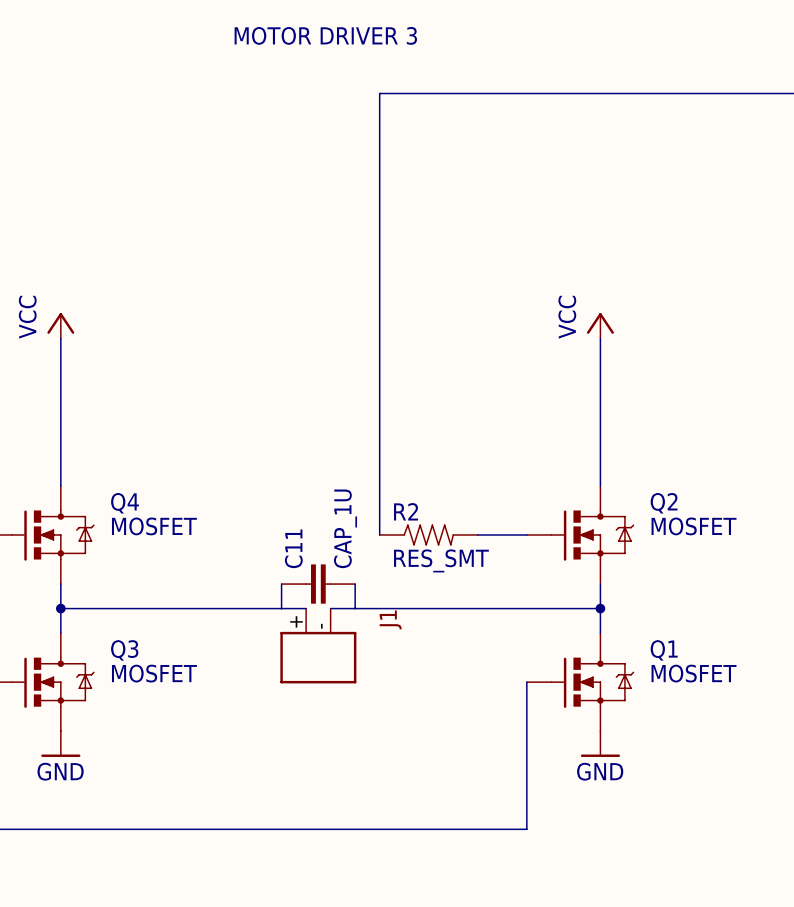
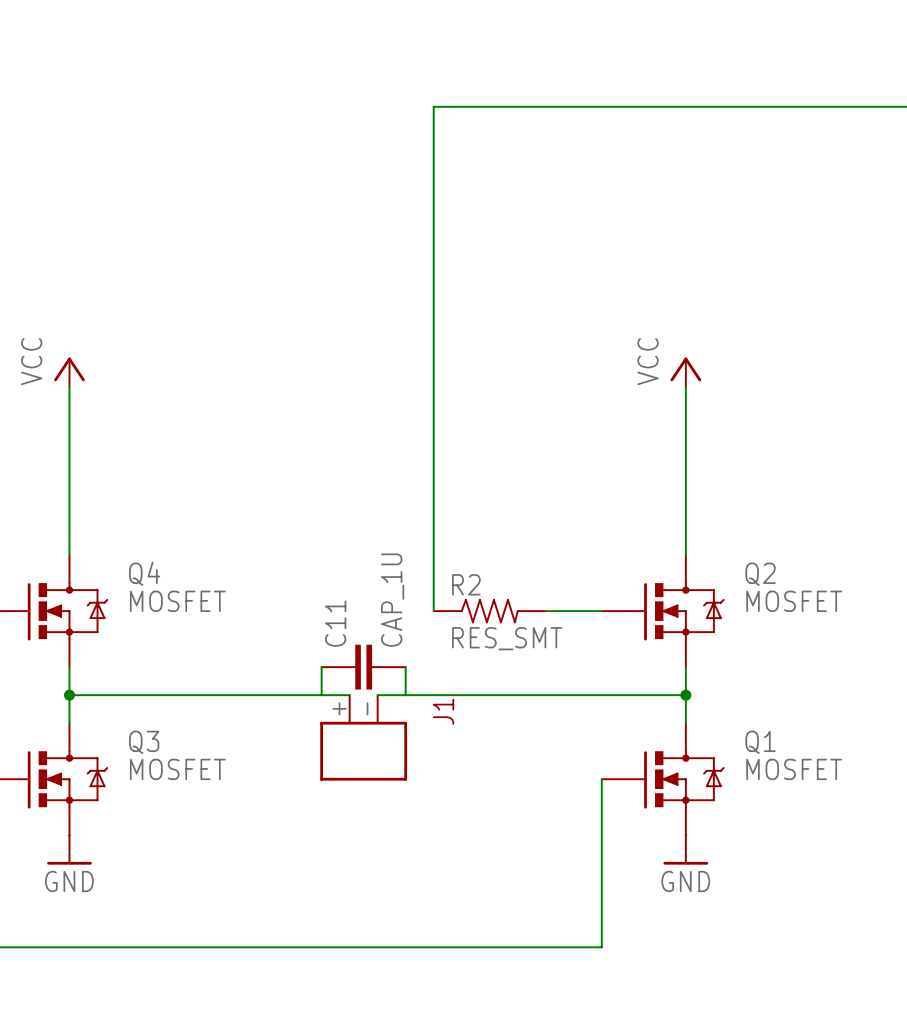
text: MOTOR DRIVER 3 (325, 35) -> none

